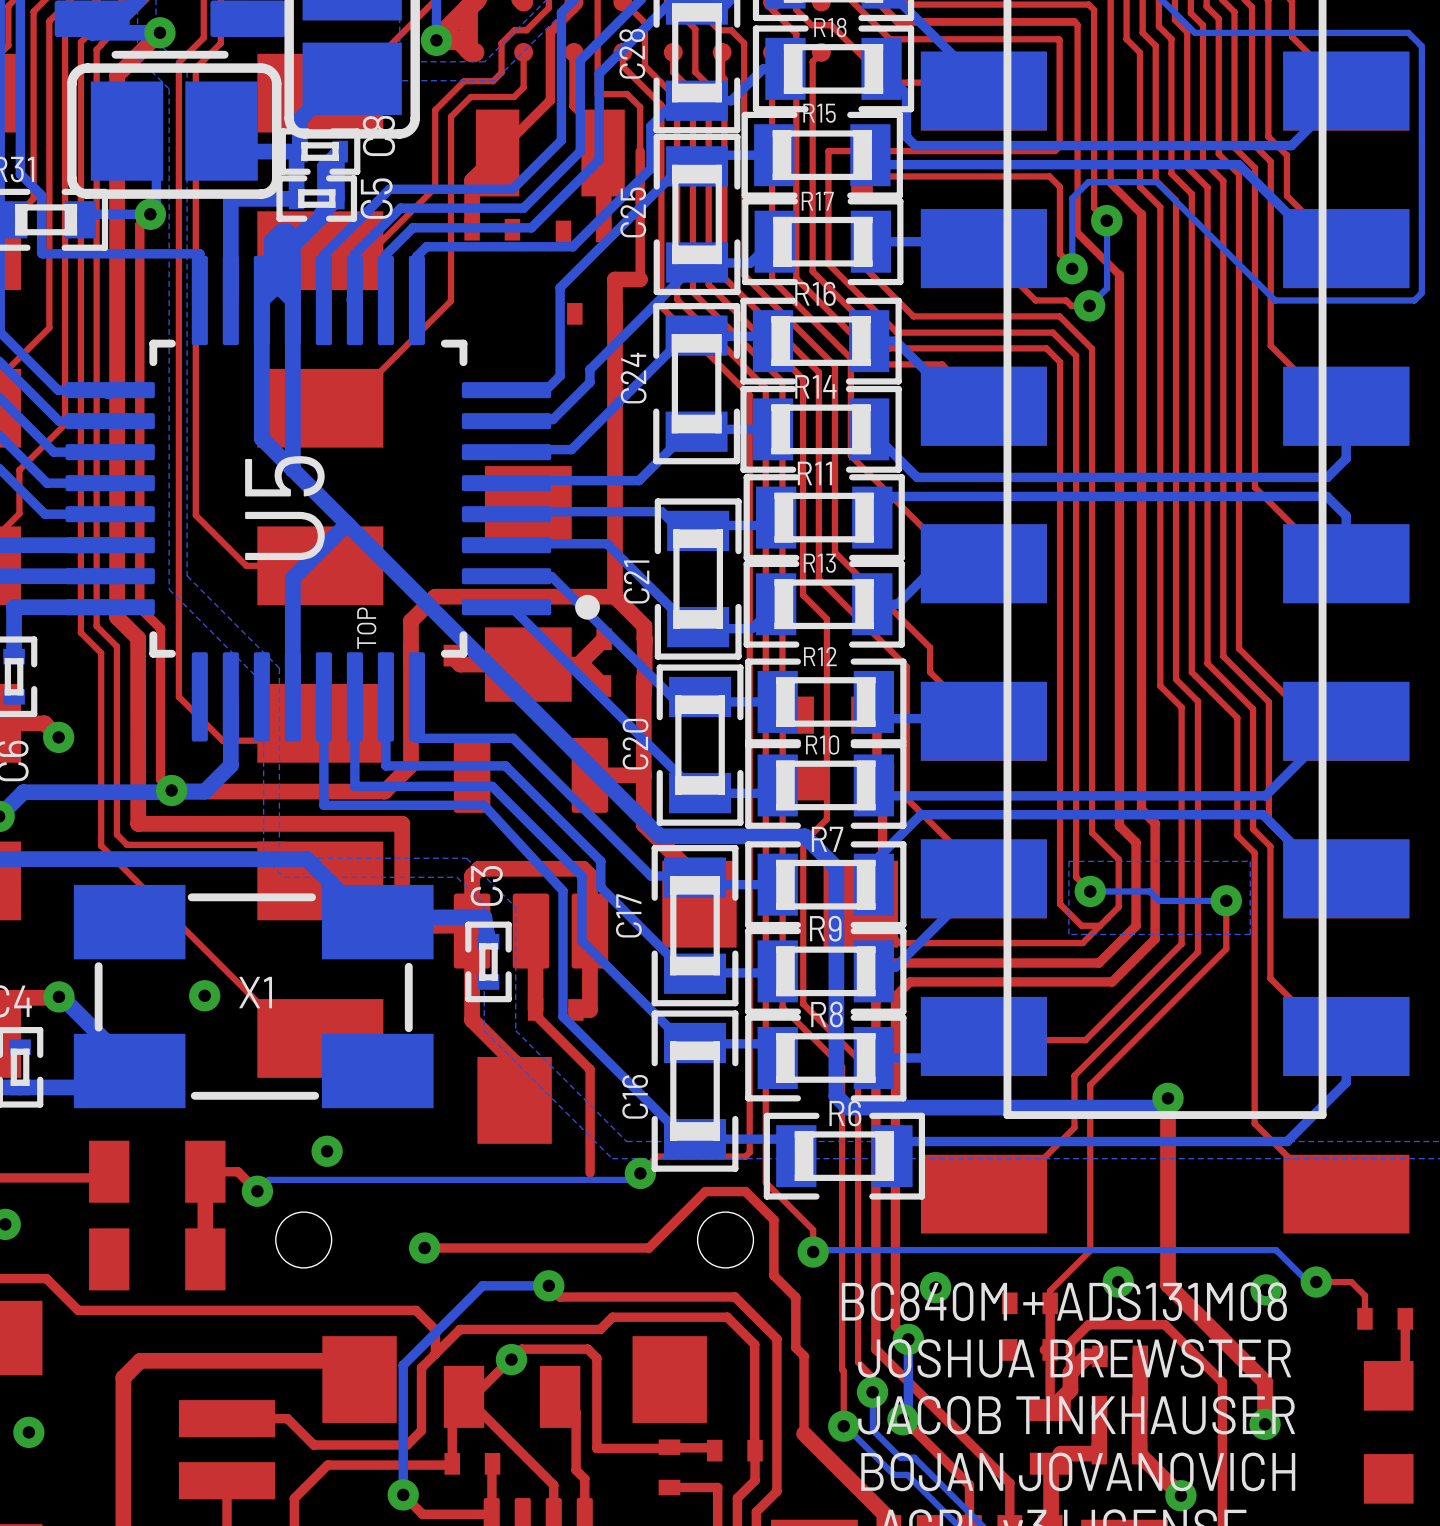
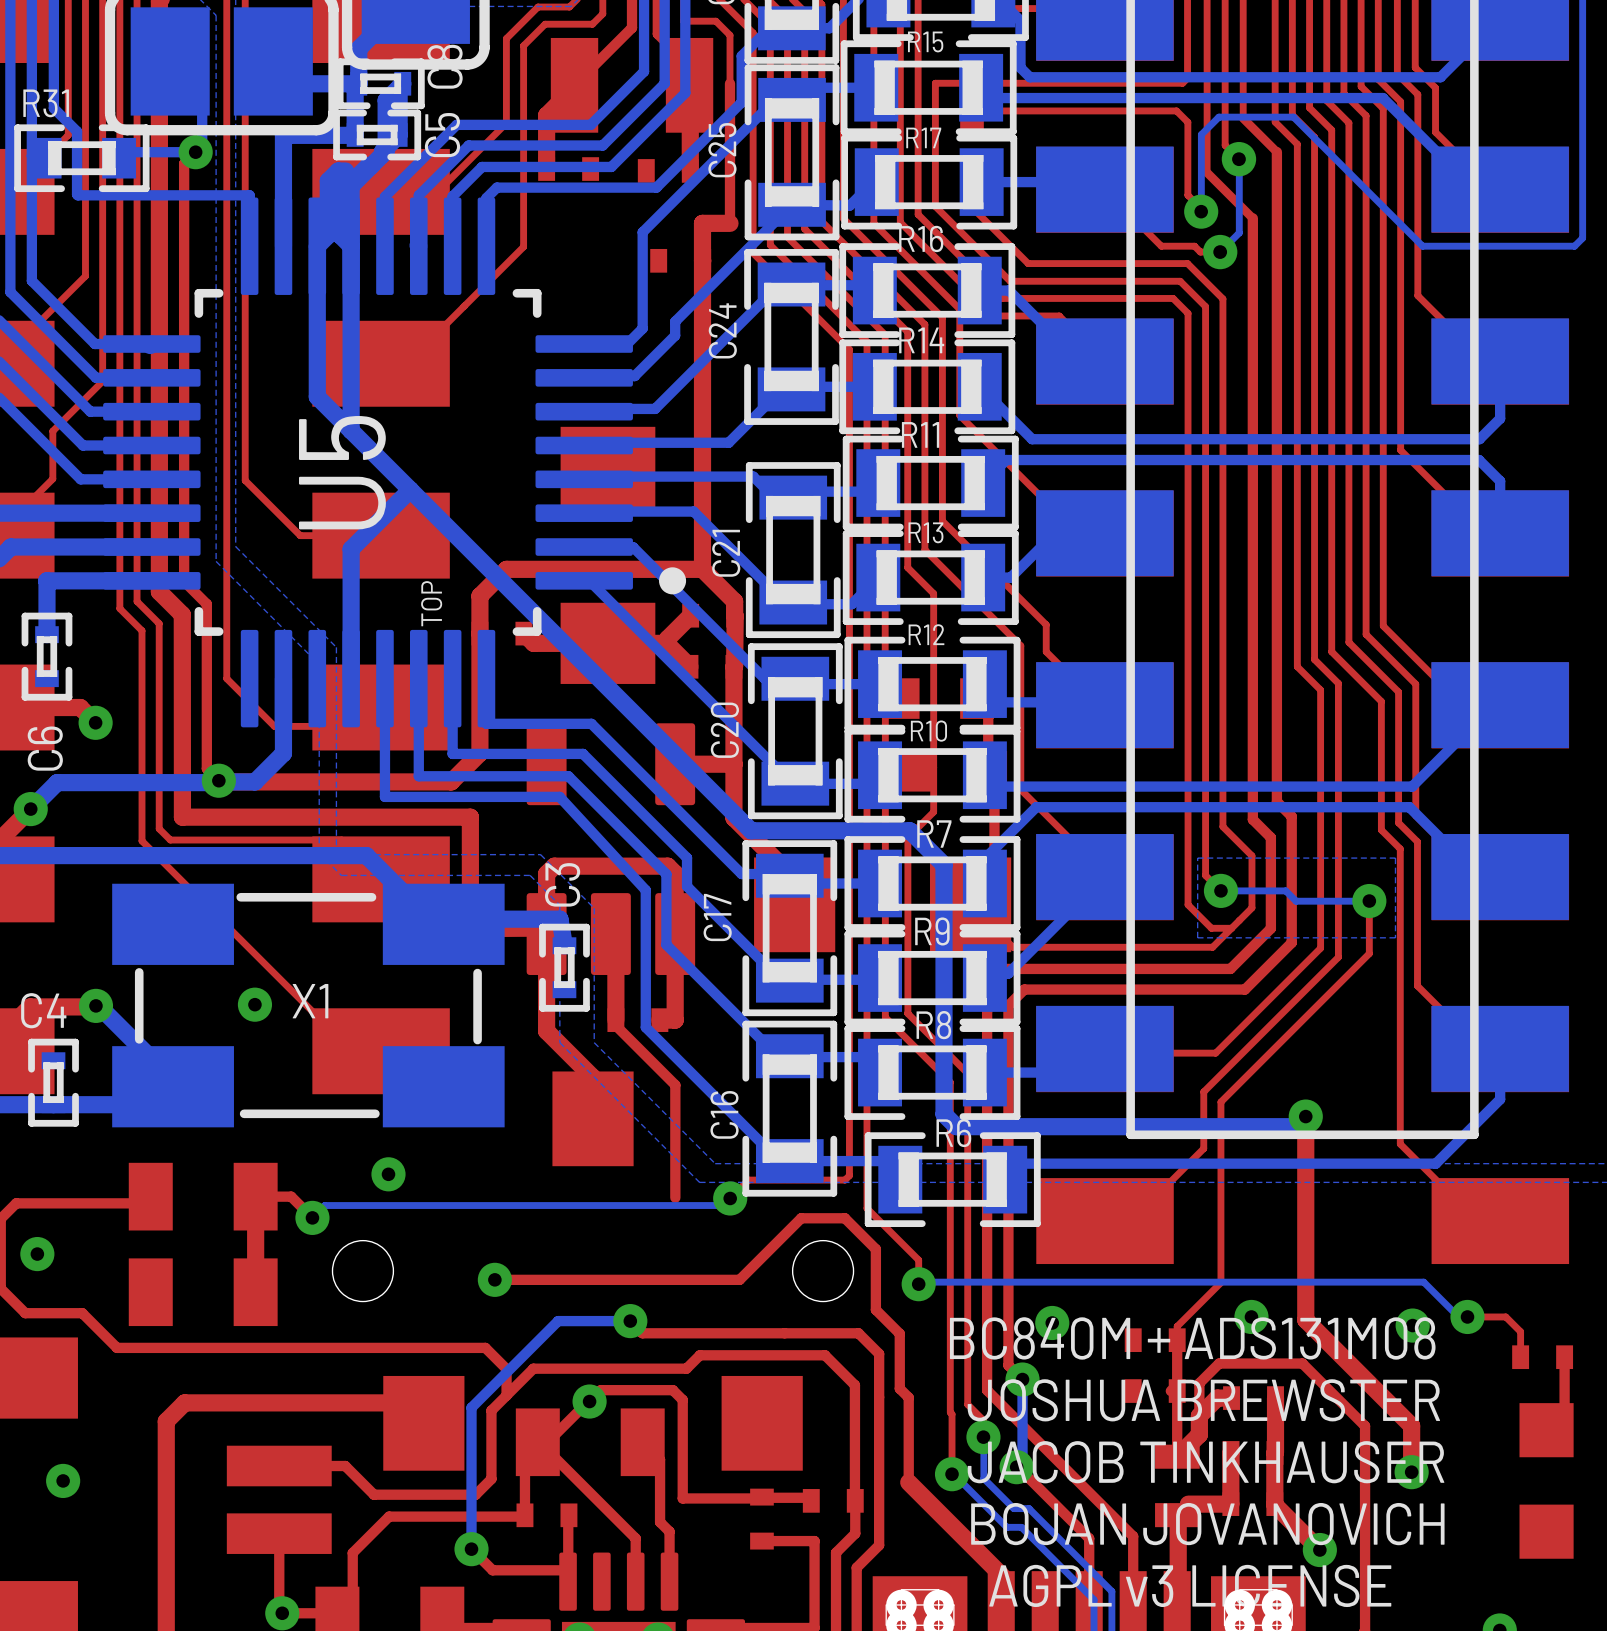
top track: (735, 1297) (776, 1338) -> (833, 1333) (858, 1333) (879, 1353) (879, 1379)

